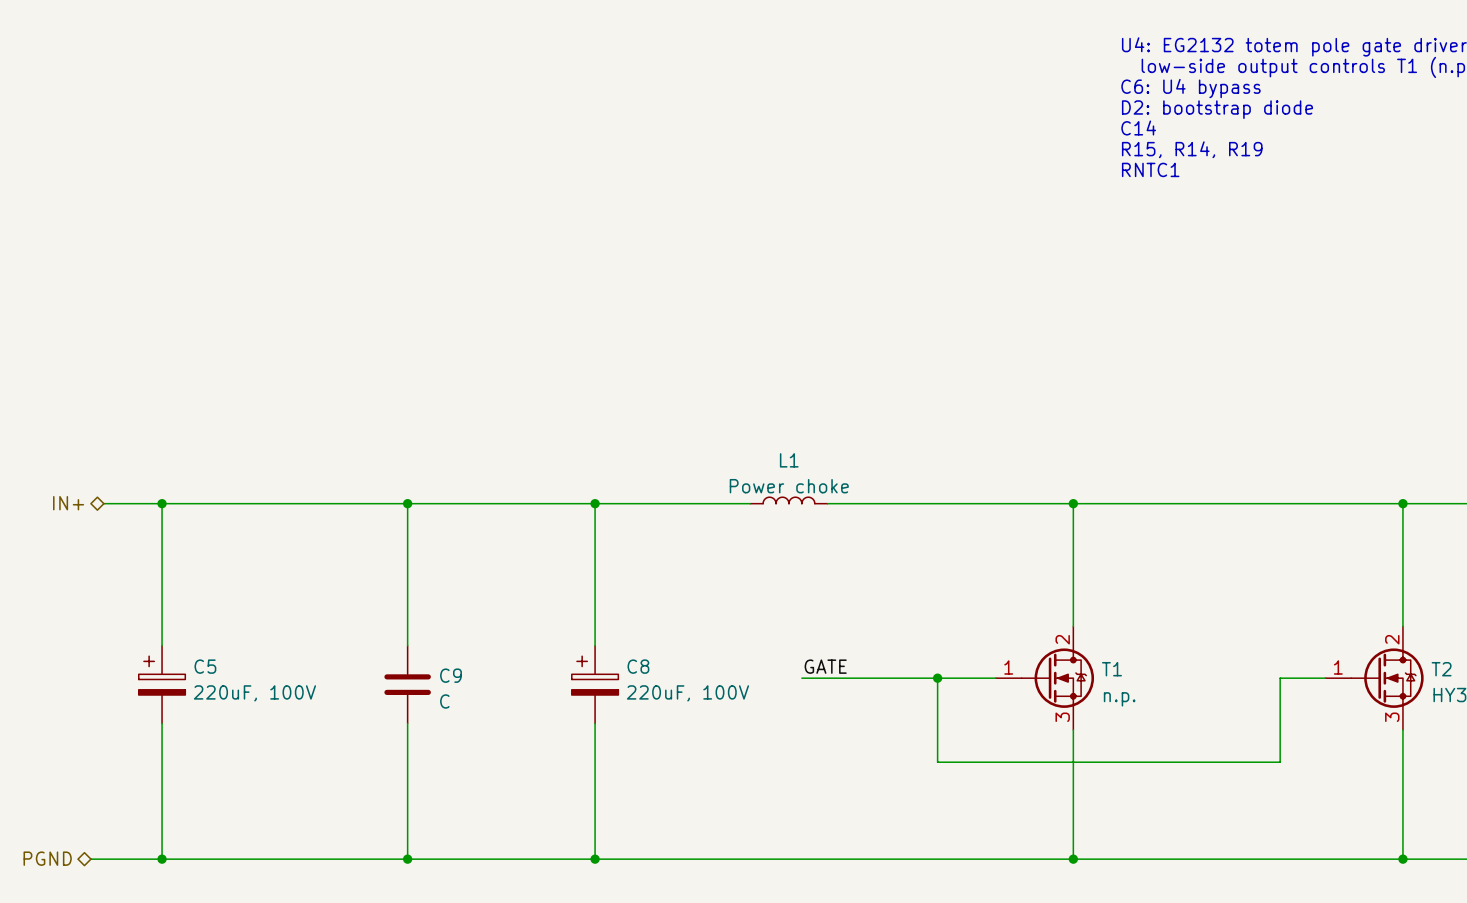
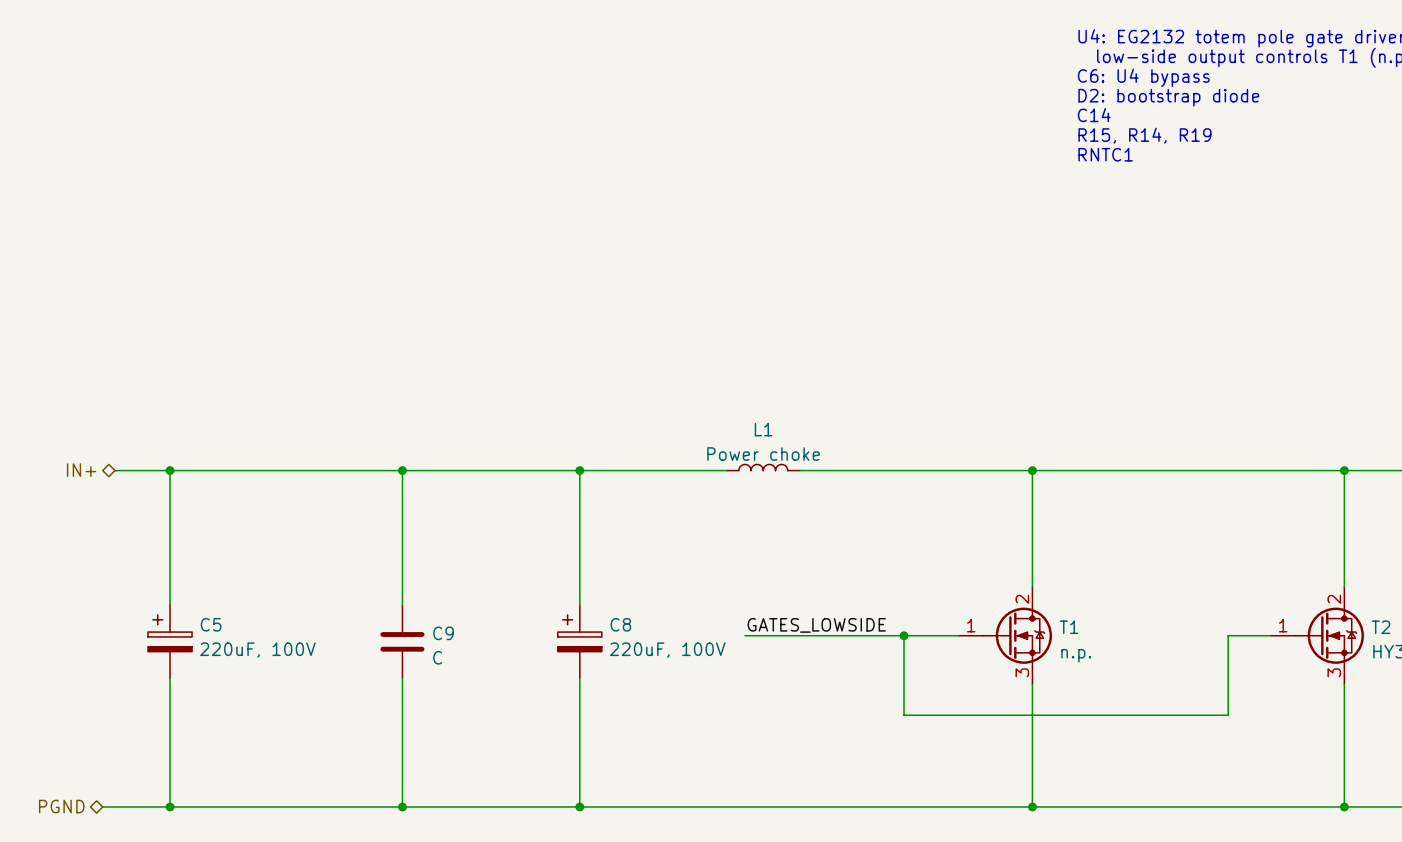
label: GATE (825, 666) -> none
label: none -> GATES_LOWSIDE (816, 625)
wire: none -> (744, 635) (775, 635)

